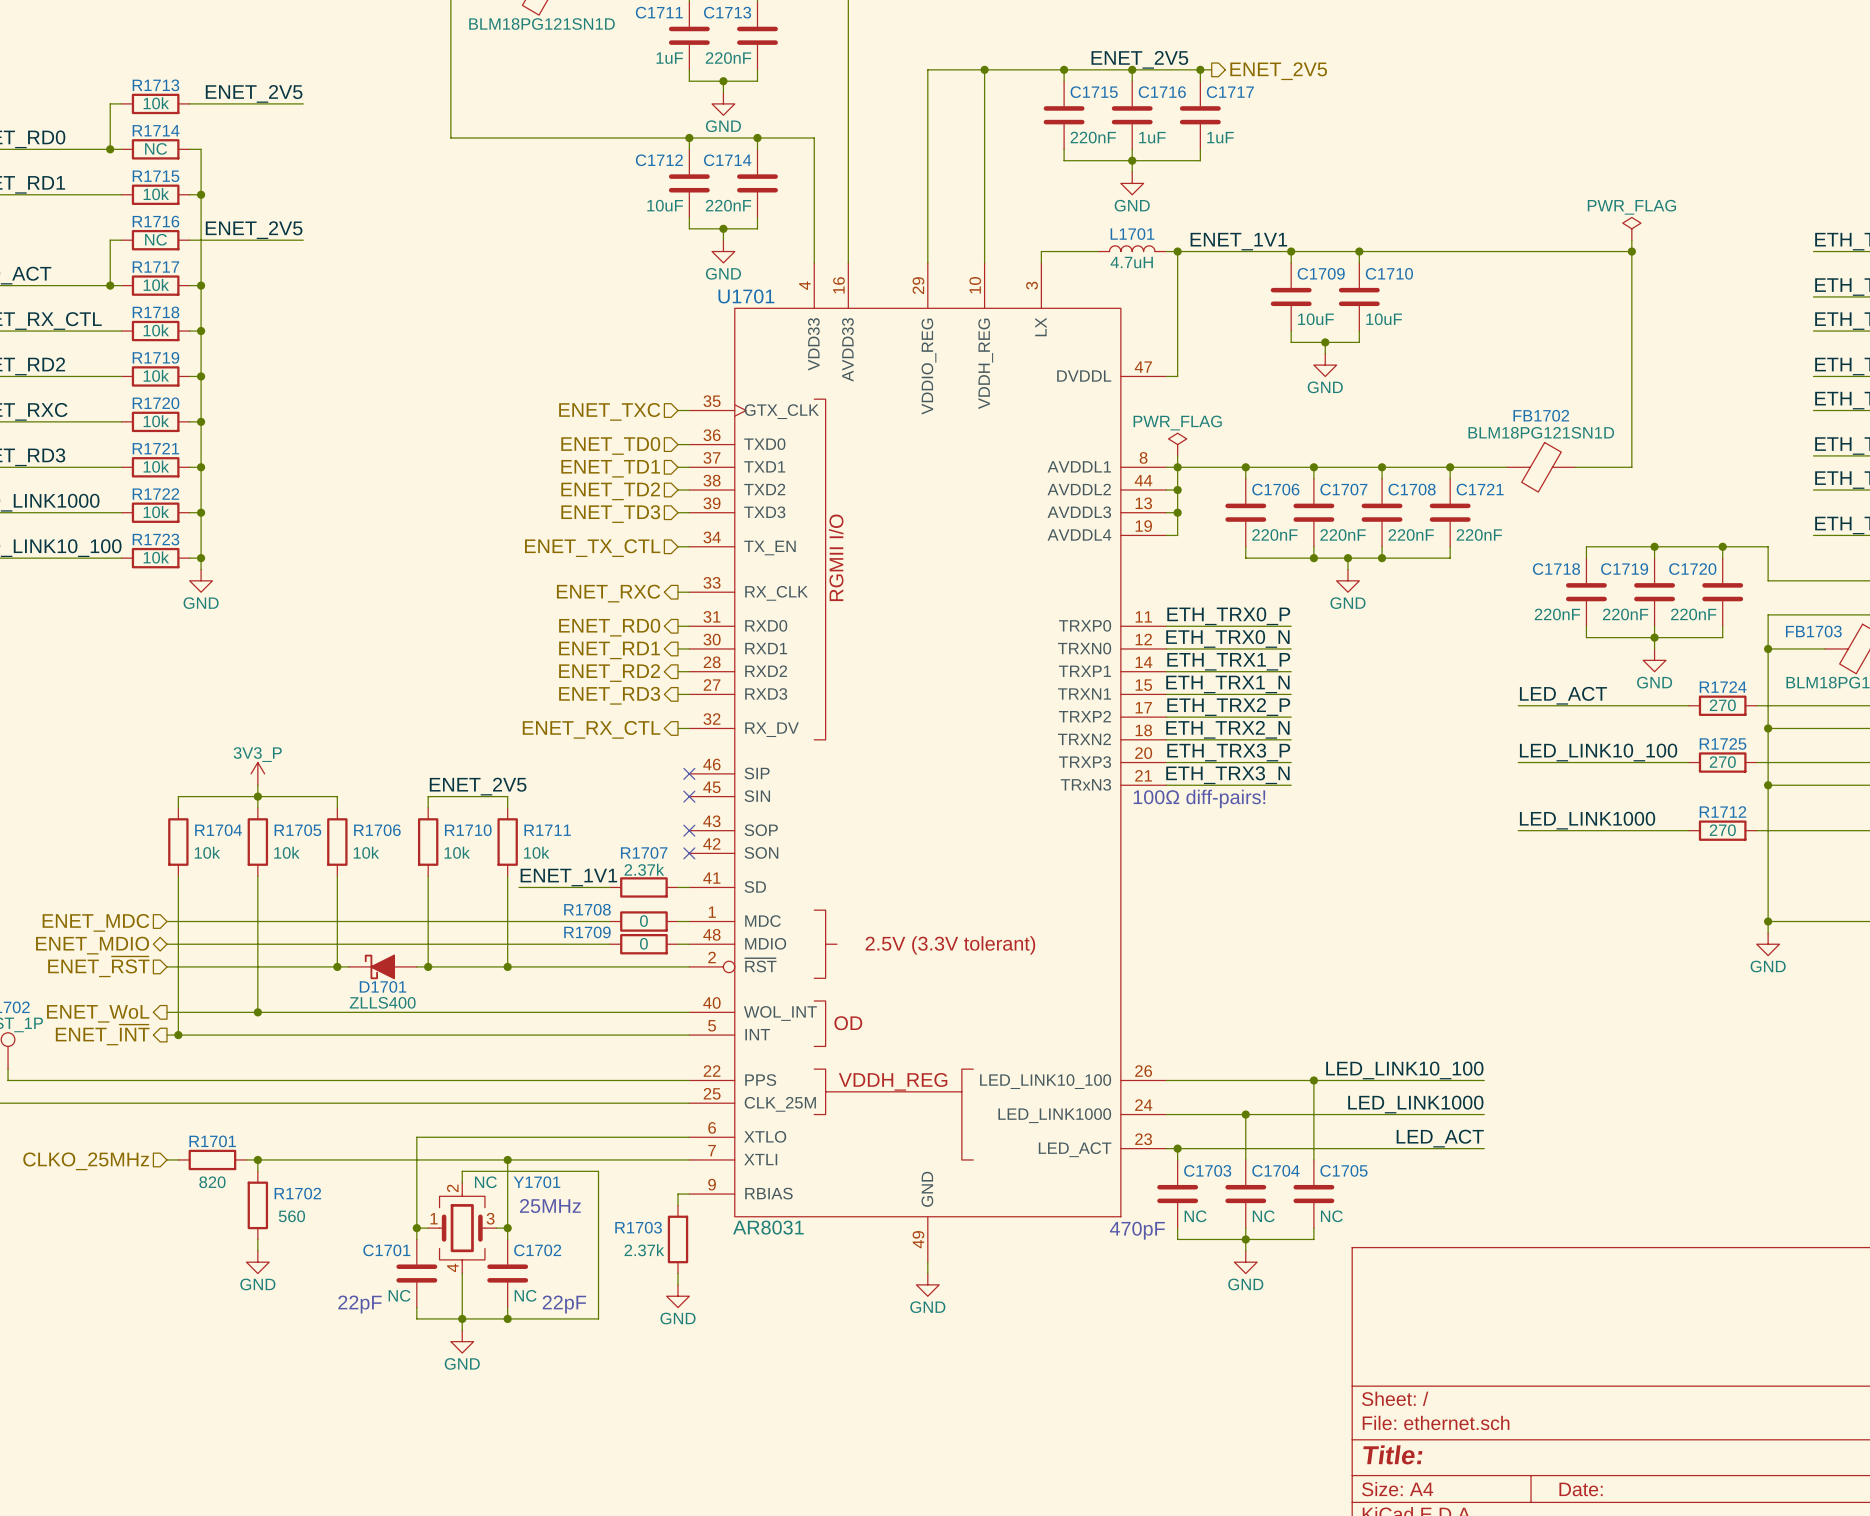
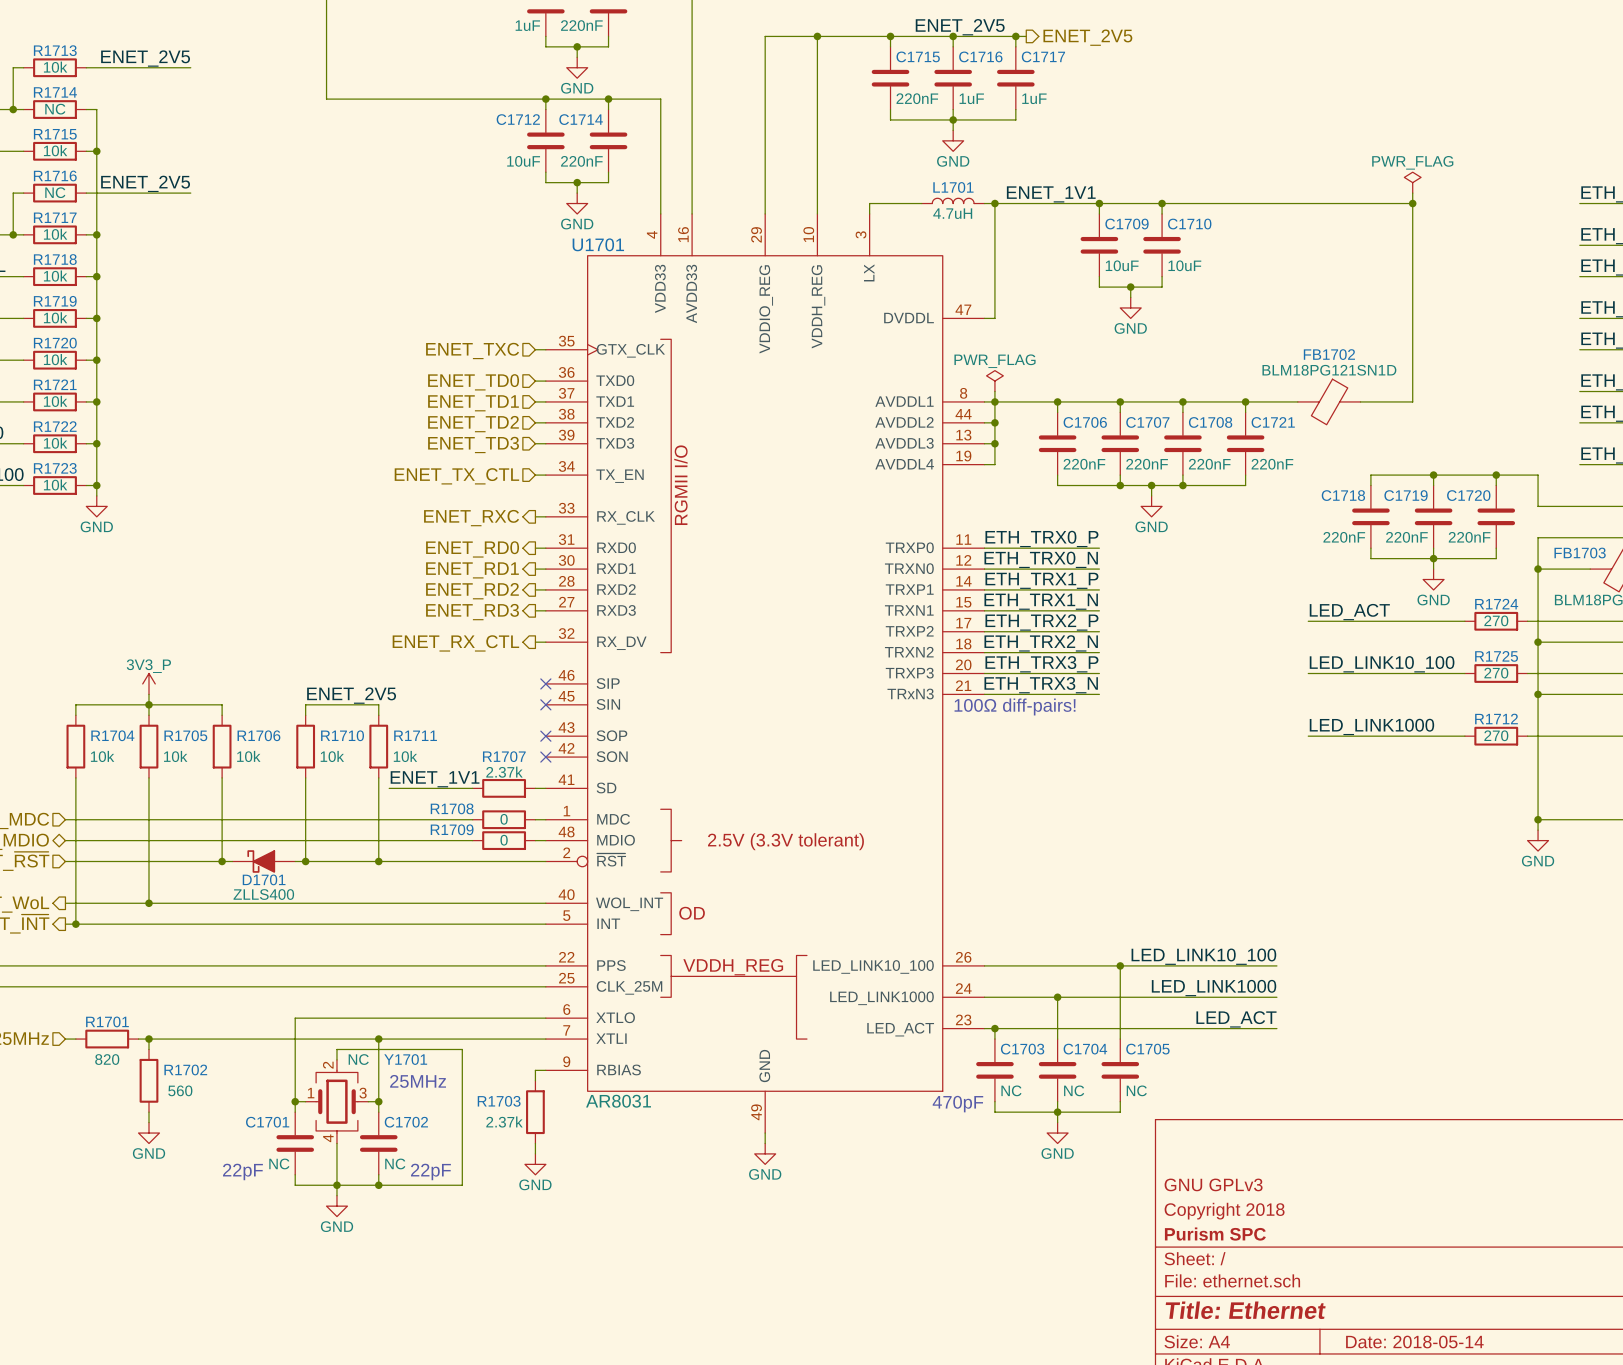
title block: none -> GNU GPLv3 (1213, 1184)
title block: none -> Copyright 2018 (1224, 1211)
title block: none -> Purism SPC (1215, 1234)
title block: Title: (1392, 1454) -> Title: Ethernet (1245, 1310)
title block: Date: (1581, 1489) -> Date: 2018-05-14 (1414, 1342)

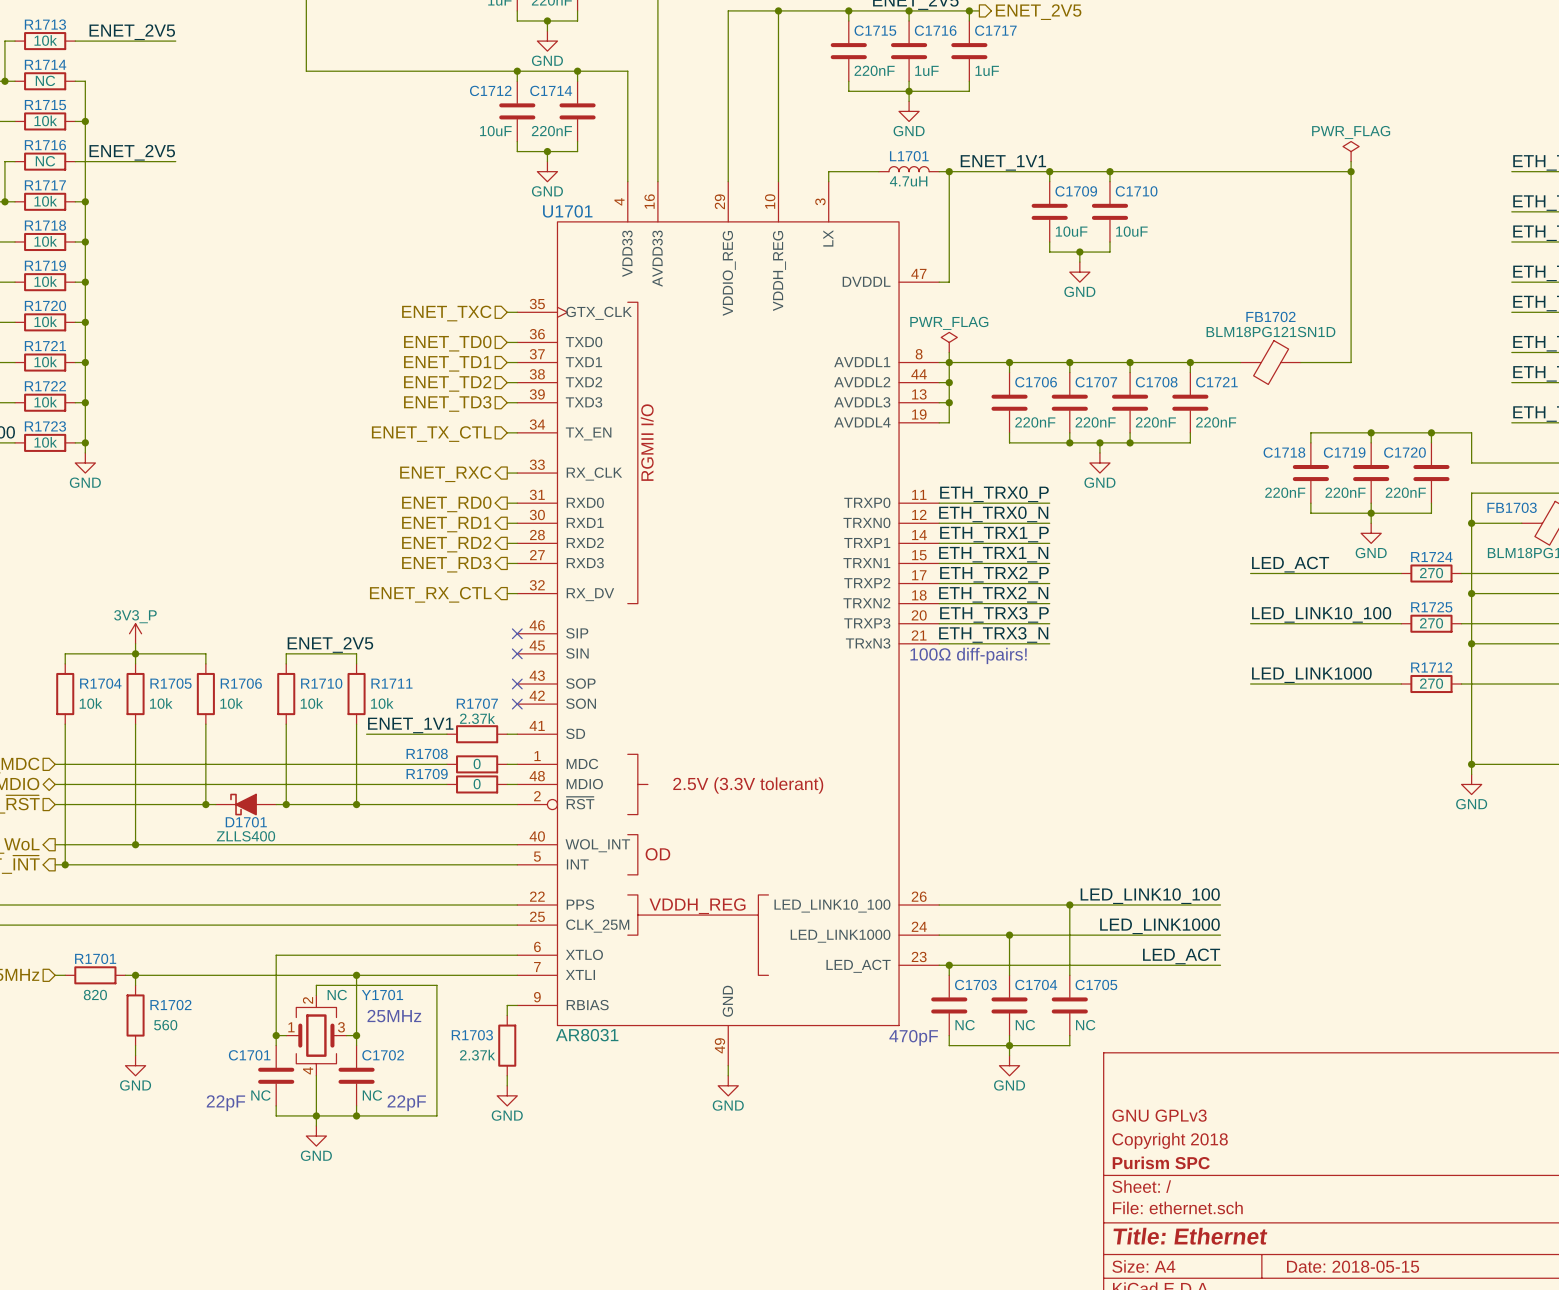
title block: Date: 2018-05-14 (1414, 1342) -> Date: 2018-05-15 (1353, 1266)

